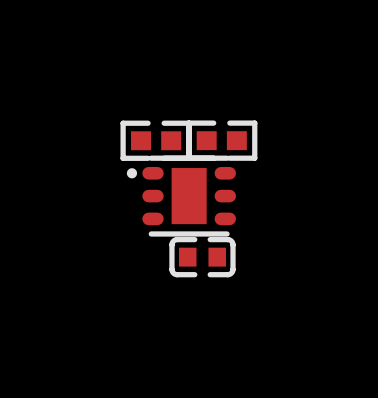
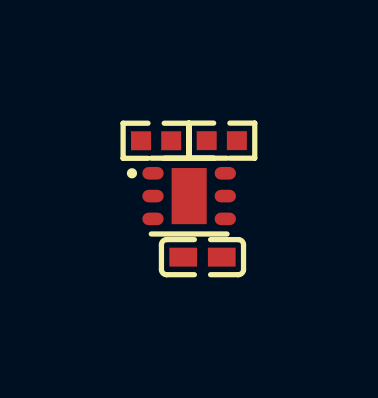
part footprint: [169, 236, 236, 278] -> [158, 236, 247, 278]

